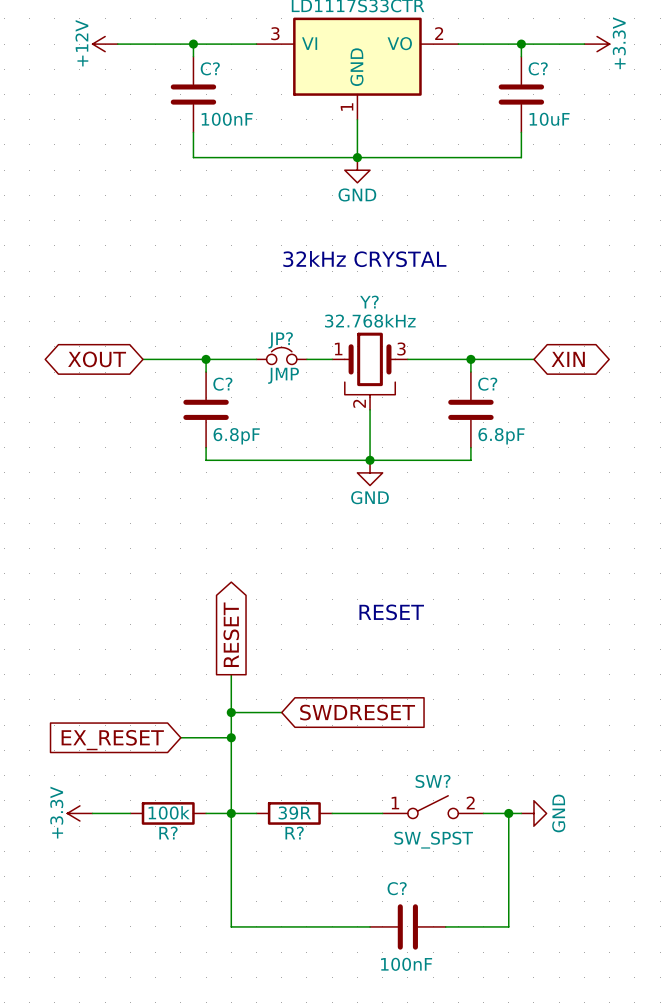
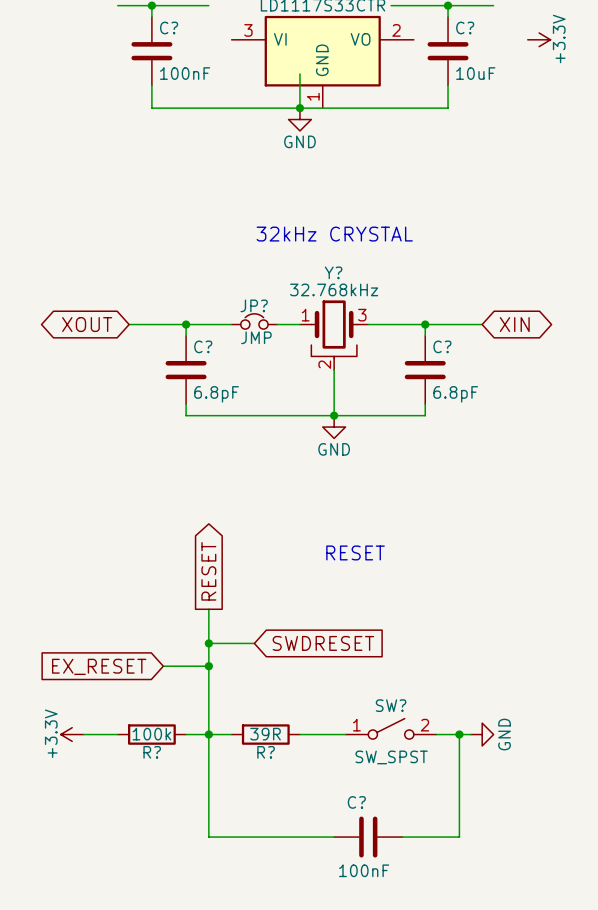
wire: none -> (117, 5) (208, 5)
wire: none -> (391, 5) (493, 5)
power symbol: +12V (105, 44) -> none
wire: (117, 44) (256, 44) -> none
wire: (193, 44) (193, 56) -> (151, 5) (151, 17)
junction position: (193, 44) -> (151, 5)
wire: (458, 44) (584, 44) -> none
wire: (521, 44) (521, 56) -> (448, 5) (448, 17)
junction position: (521, 44) -> (448, 5)
C? position: (193, 94) -> (151, 51)
C? position: (521, 94) -> (448, 51)
wire: (357, 119) (357, 157) -> (299, 73) (299, 108)
wire: (193, 132) (193, 157) (521, 157) (521, 132) -> (151, 85) (151, 108) (448, 108) (448, 85)
junction position: (357, 157) -> (299, 108)
power symbol position: GND (357, 170) -> GND (299, 119)

